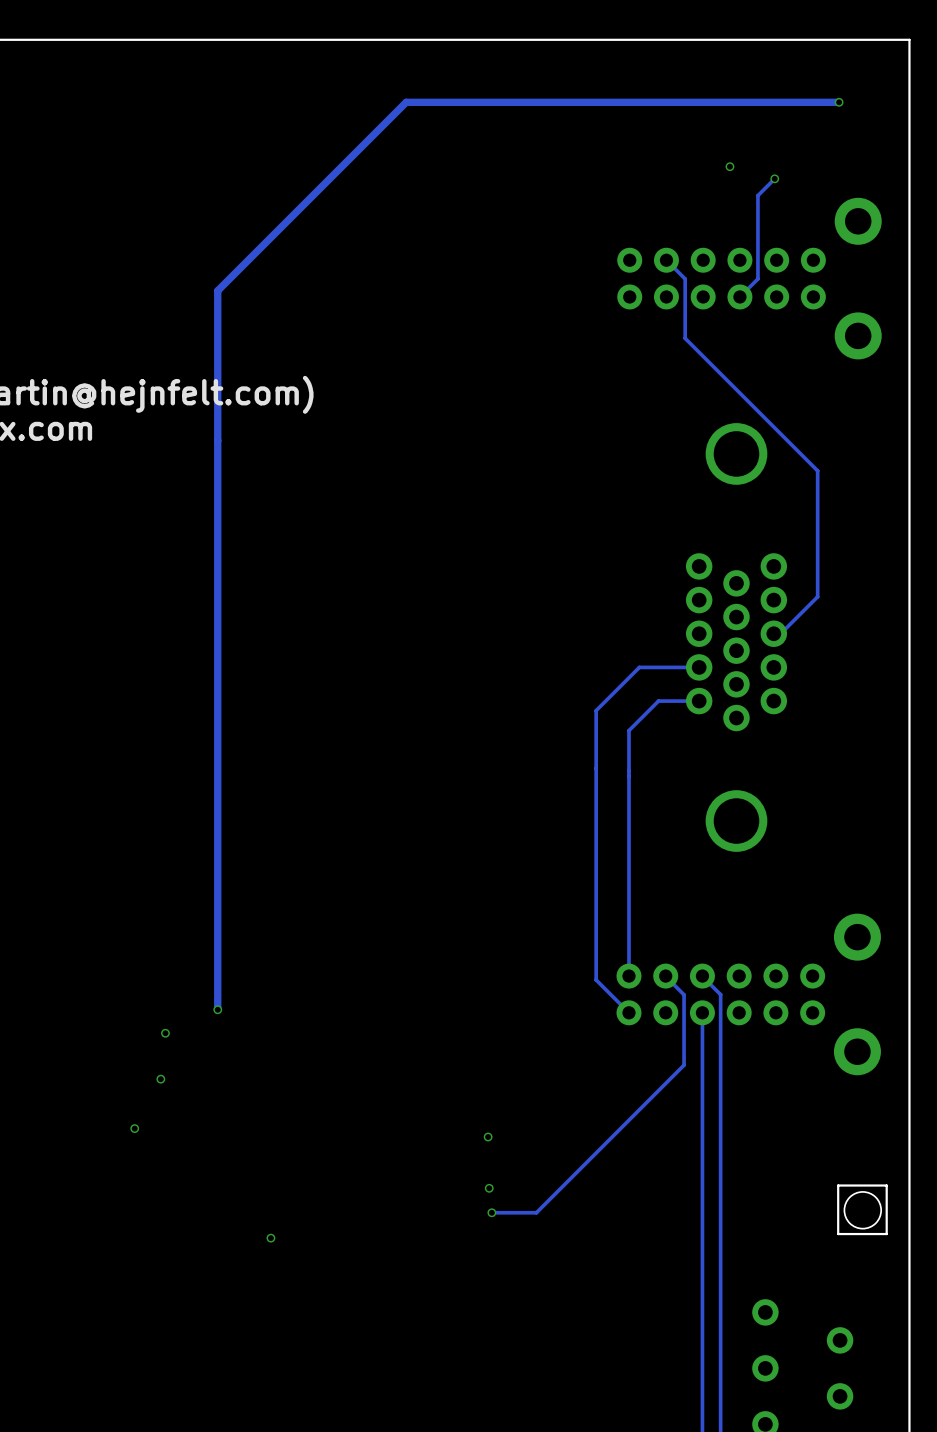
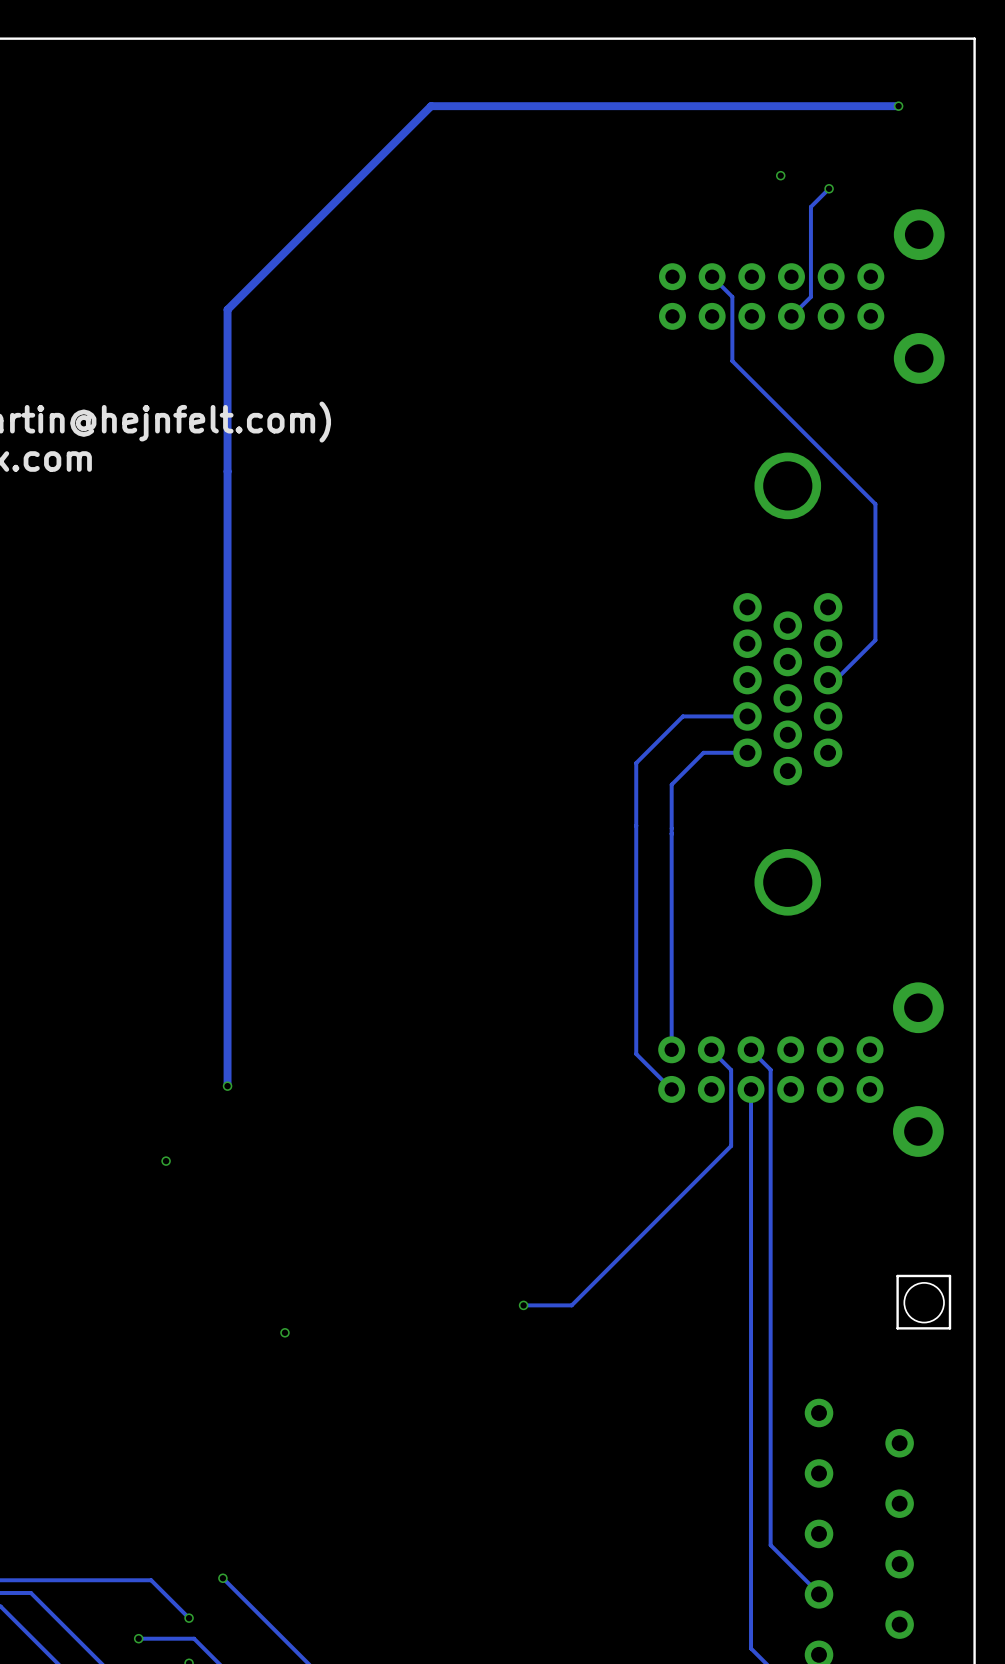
via: (165, 1033) -> none
via: (134, 1128) -> none
via: (488, 1137) -> none
via: (489, 1188) -> none

